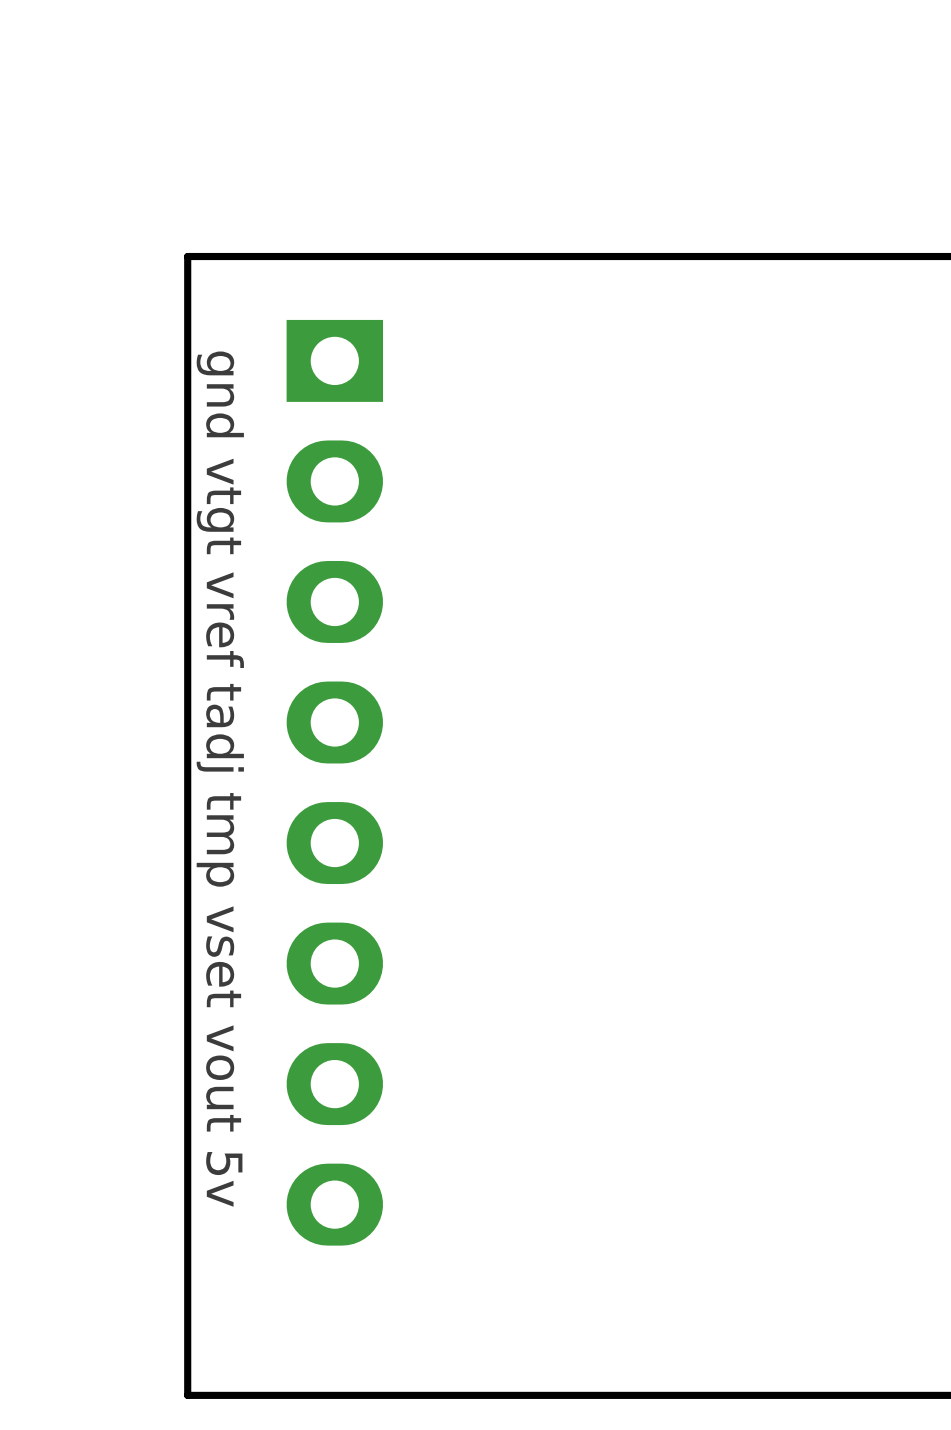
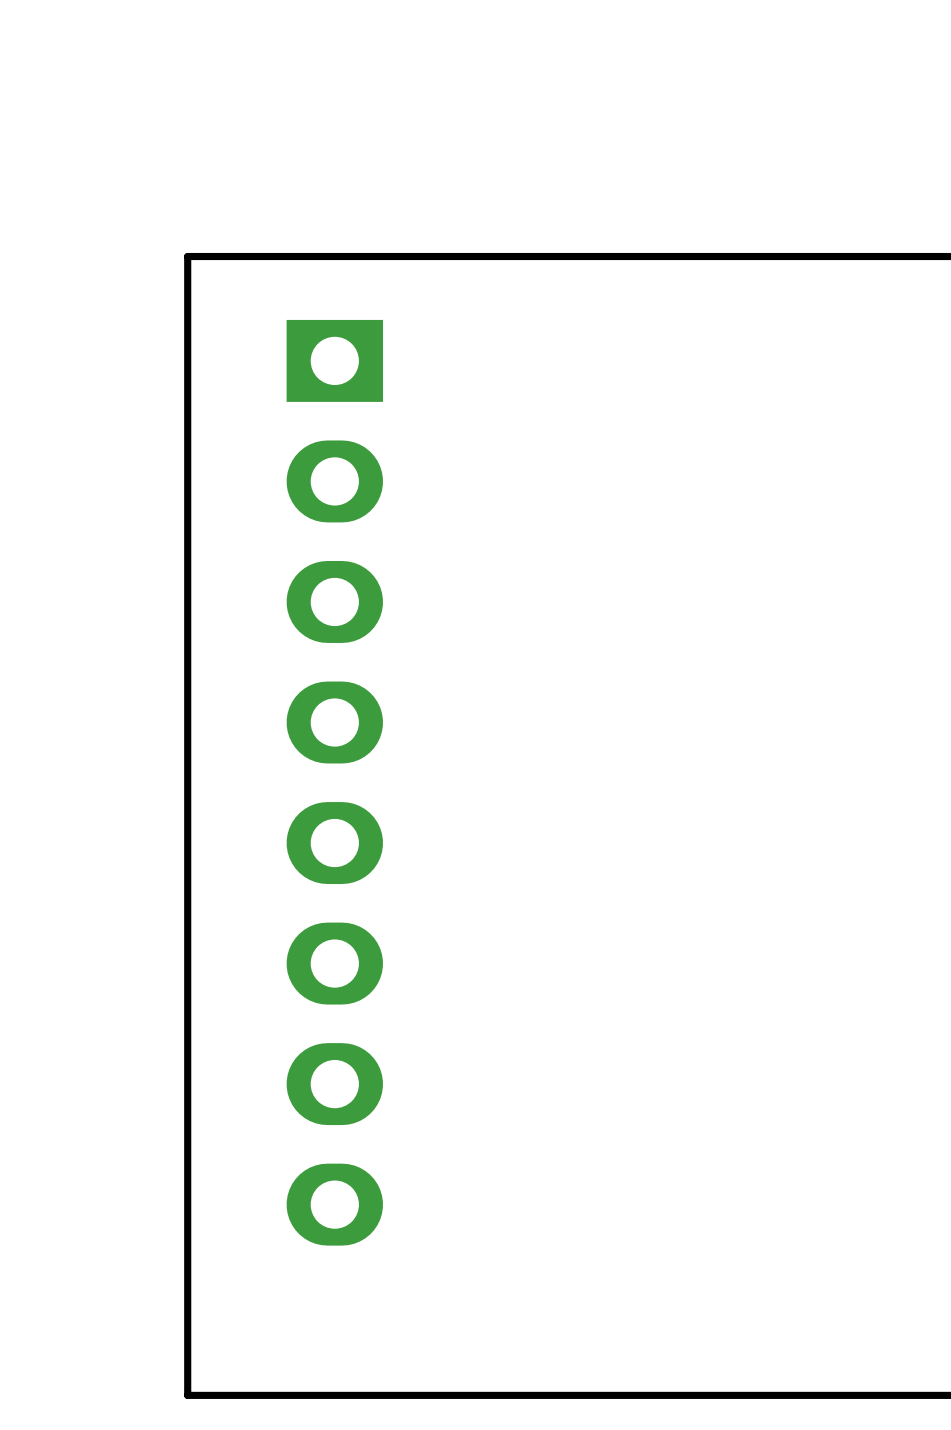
text: gnd vtgt vref tadj tmp vset vout 5v (220, 779) -> none

